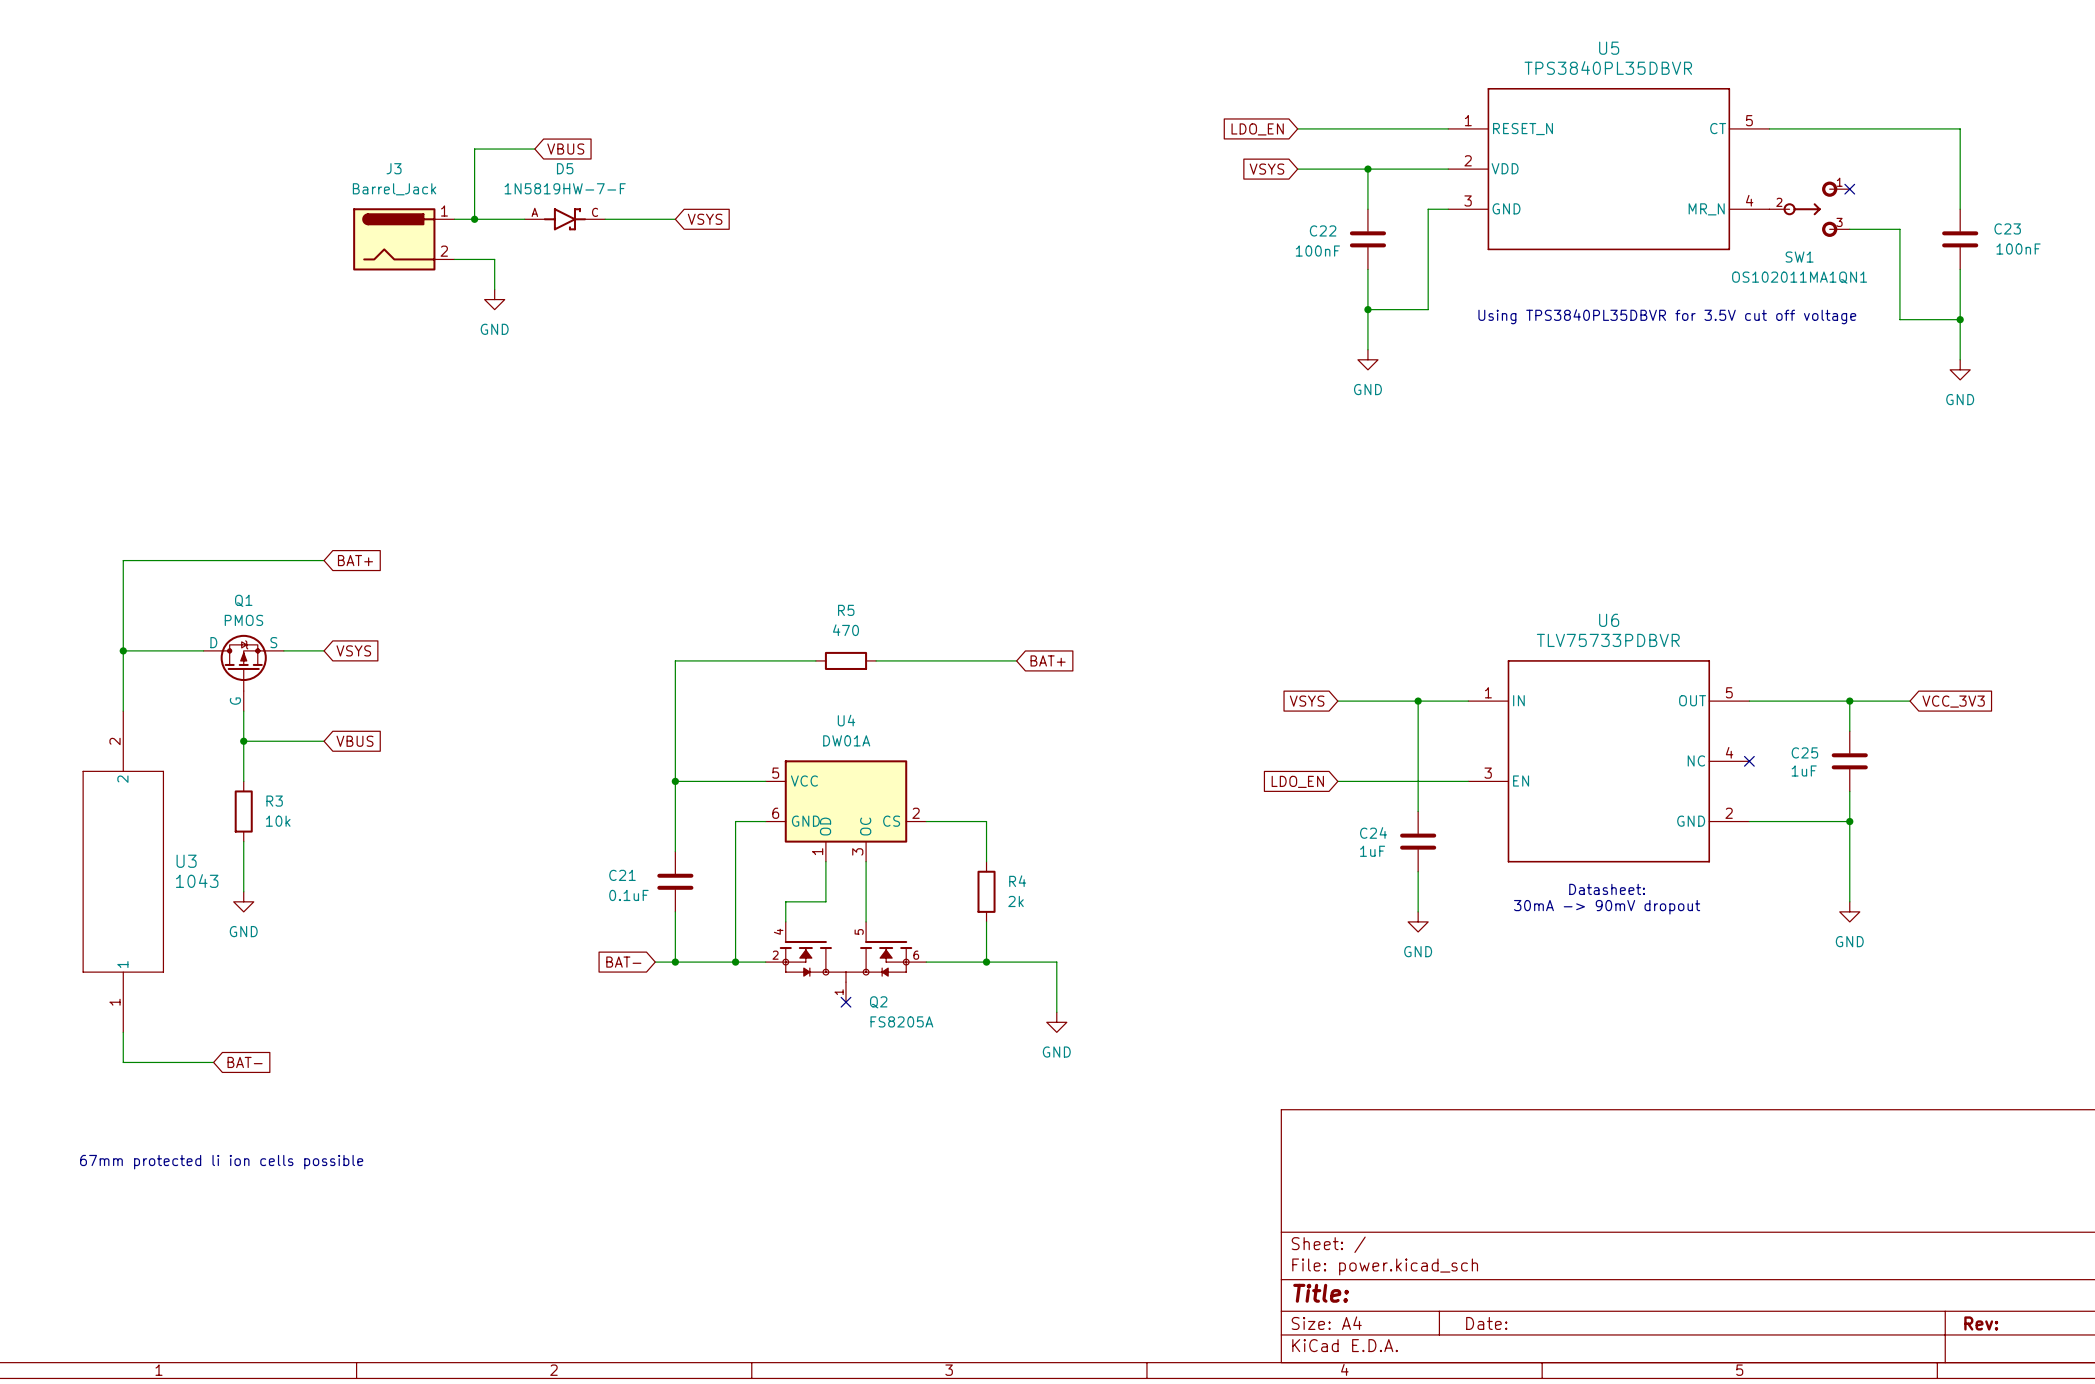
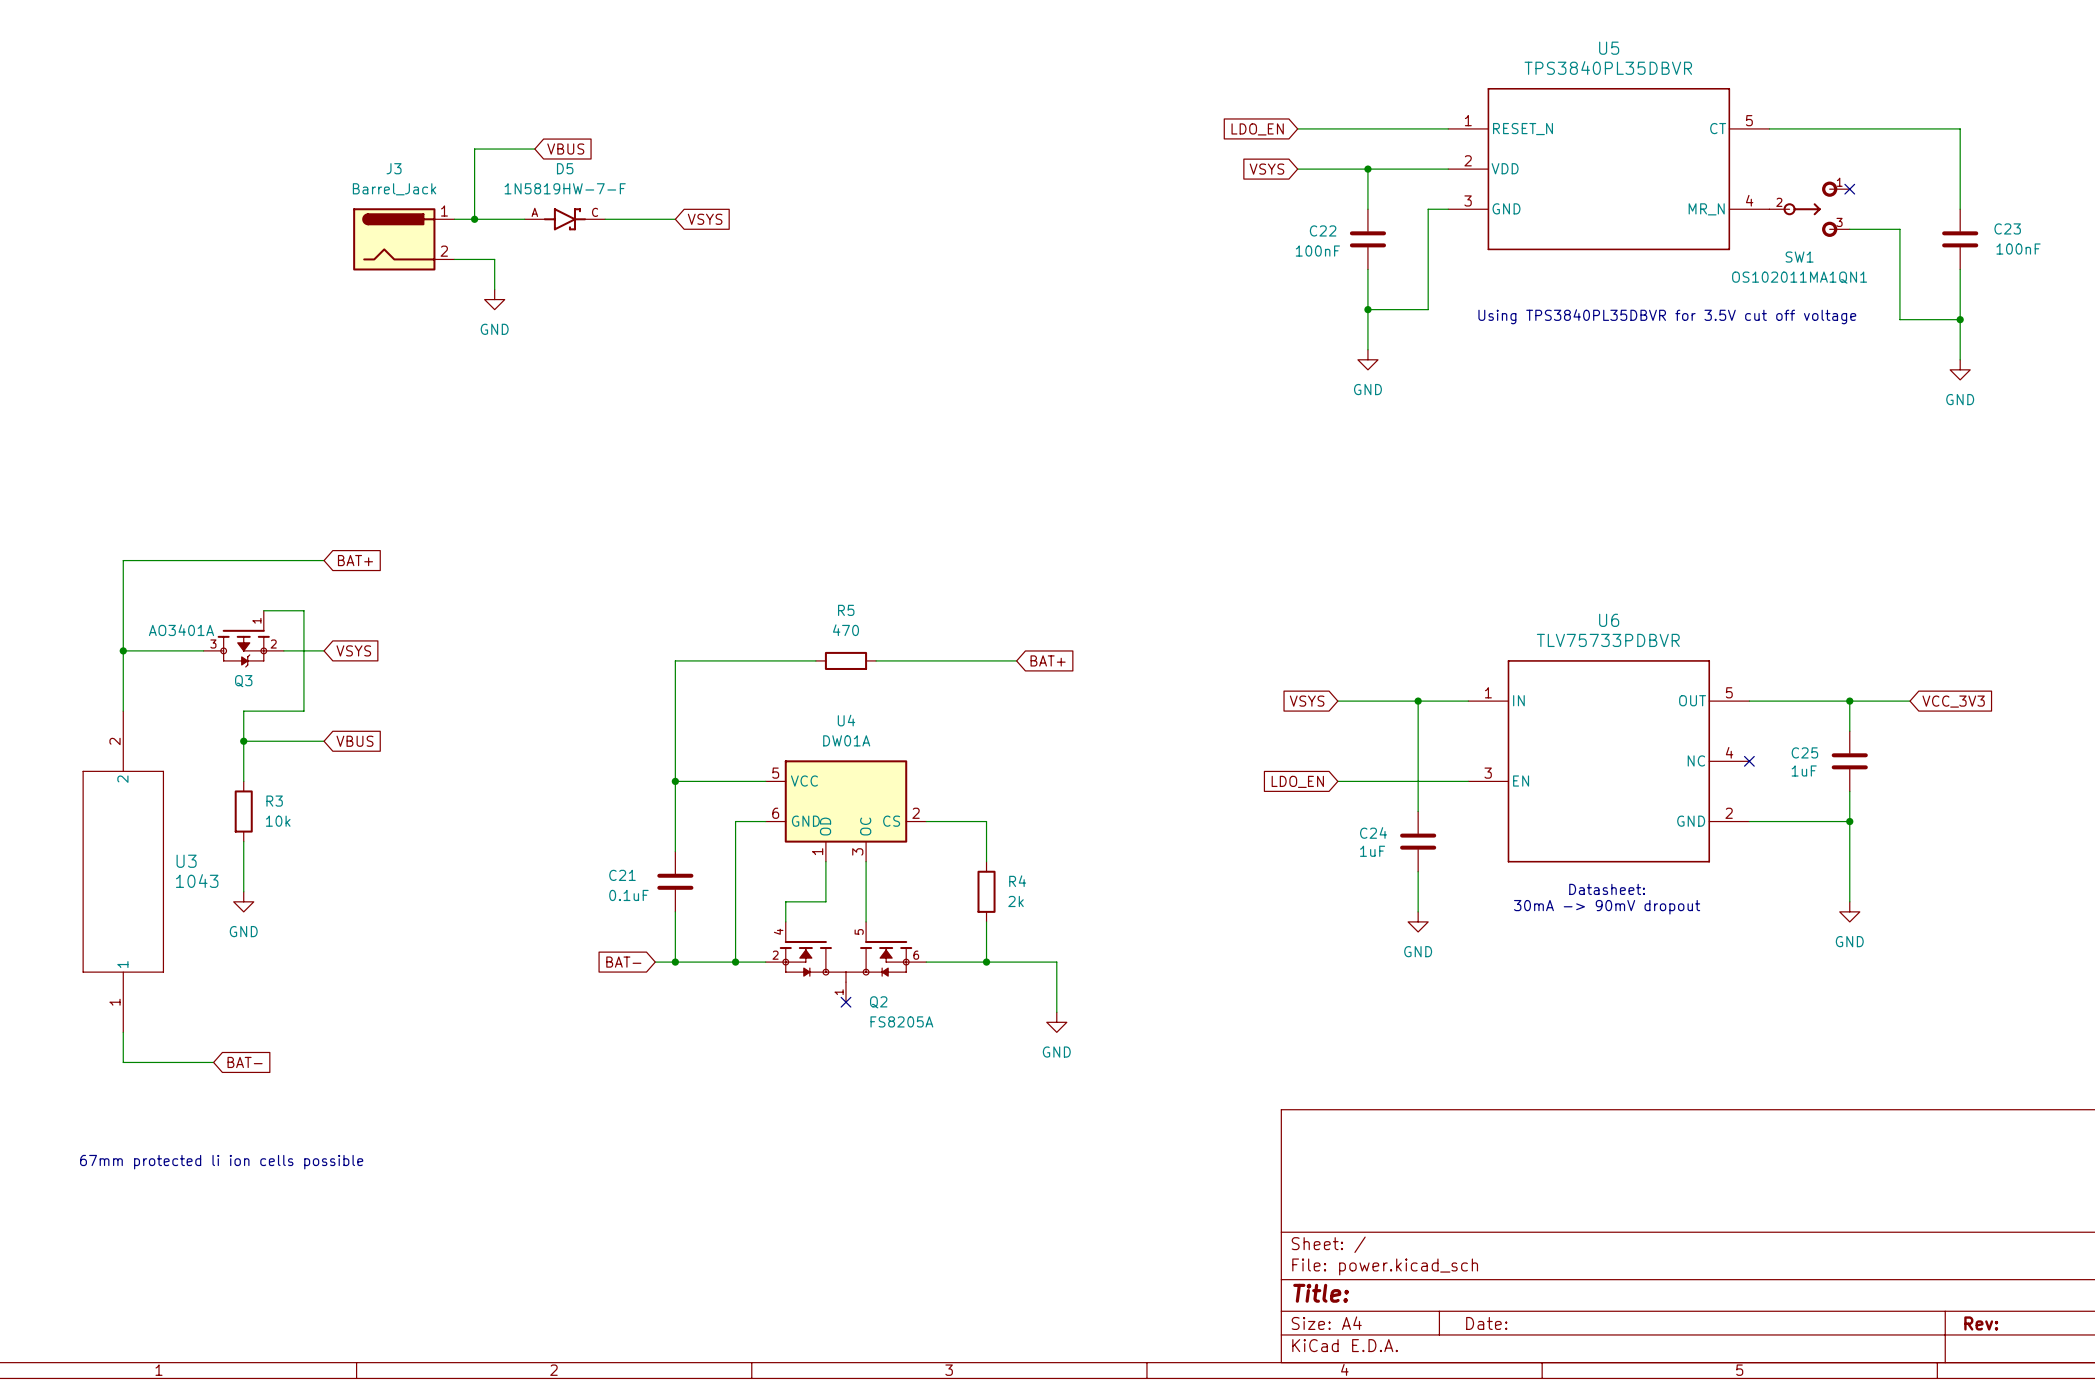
wire: none -> (263, 610) (303, 610) (303, 711) (243, 711)
Q3: none -> AO3401A (243, 639)
Q1: PMOS (243, 672) -> none

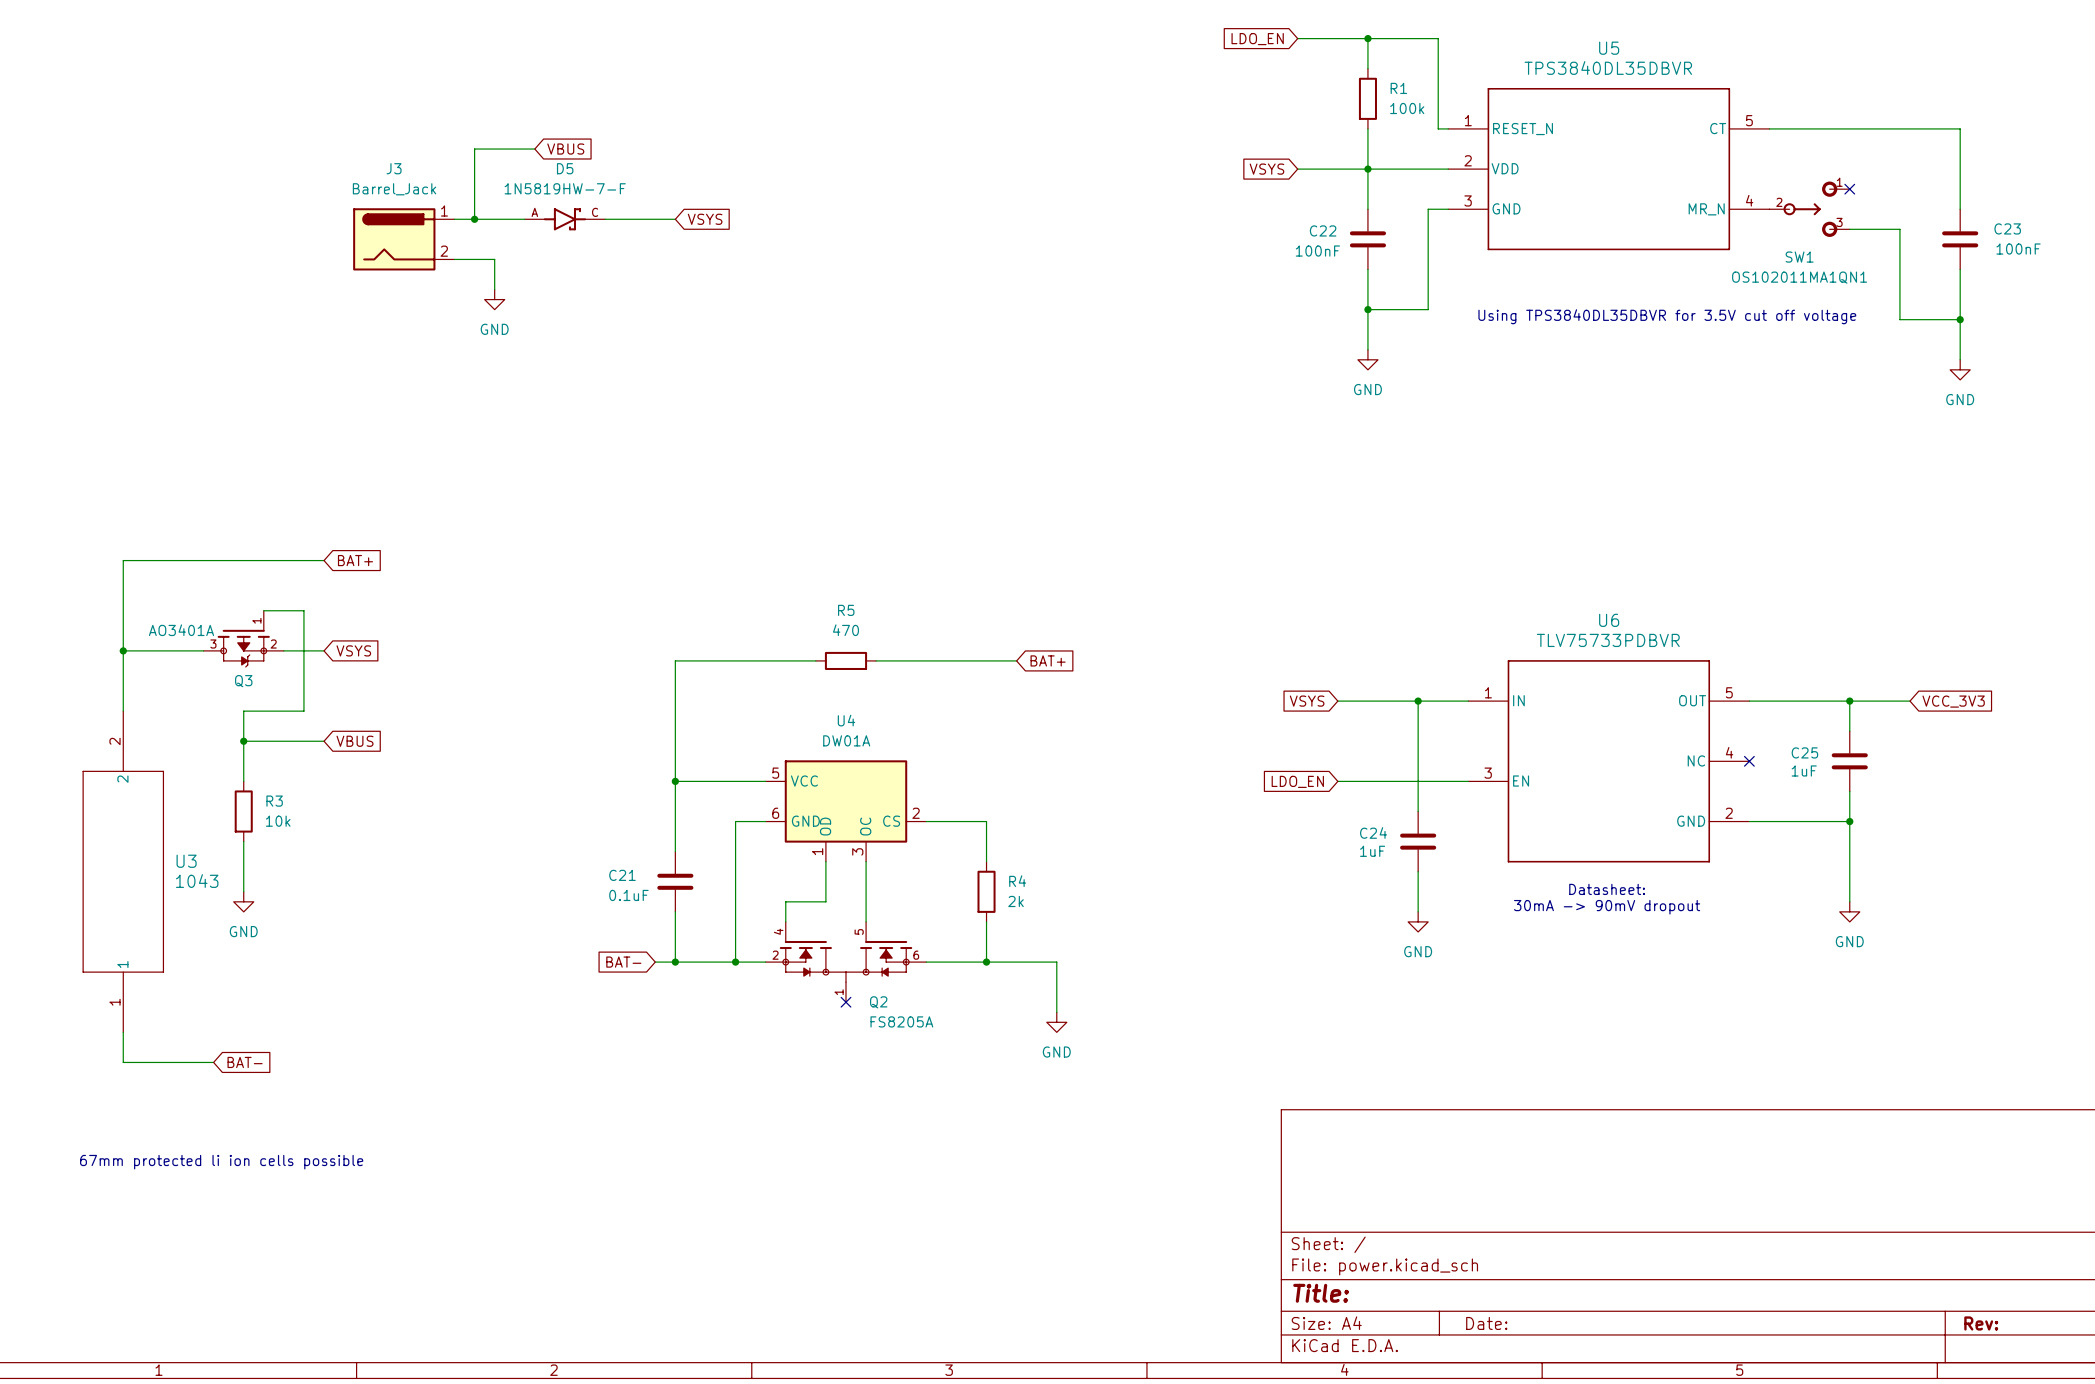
wire: none -> (1367, 38) (1367, 68)
junction: none -> (1367, 38)
U5 value: TPS3840PL35DBVR (1608, 67) -> TPS3840DL35DBVR (1608, 67)
R1: none -> 100k (1367, 98)
wire: (1297, 128) (1438, 128) -> (1297, 38) (1438, 38) (1438, 128)
wire: none -> (1367, 128) (1367, 169)
global label position: LDO_EN (1257, 129) -> LDO_EN (1257, 39)
text: Using TPS3840PL35DBVR for 3.5V cut off voltage (1667, 316) -> Using TPS3840DL35DBVR for 3.5V cut off voltage (1667, 316)

